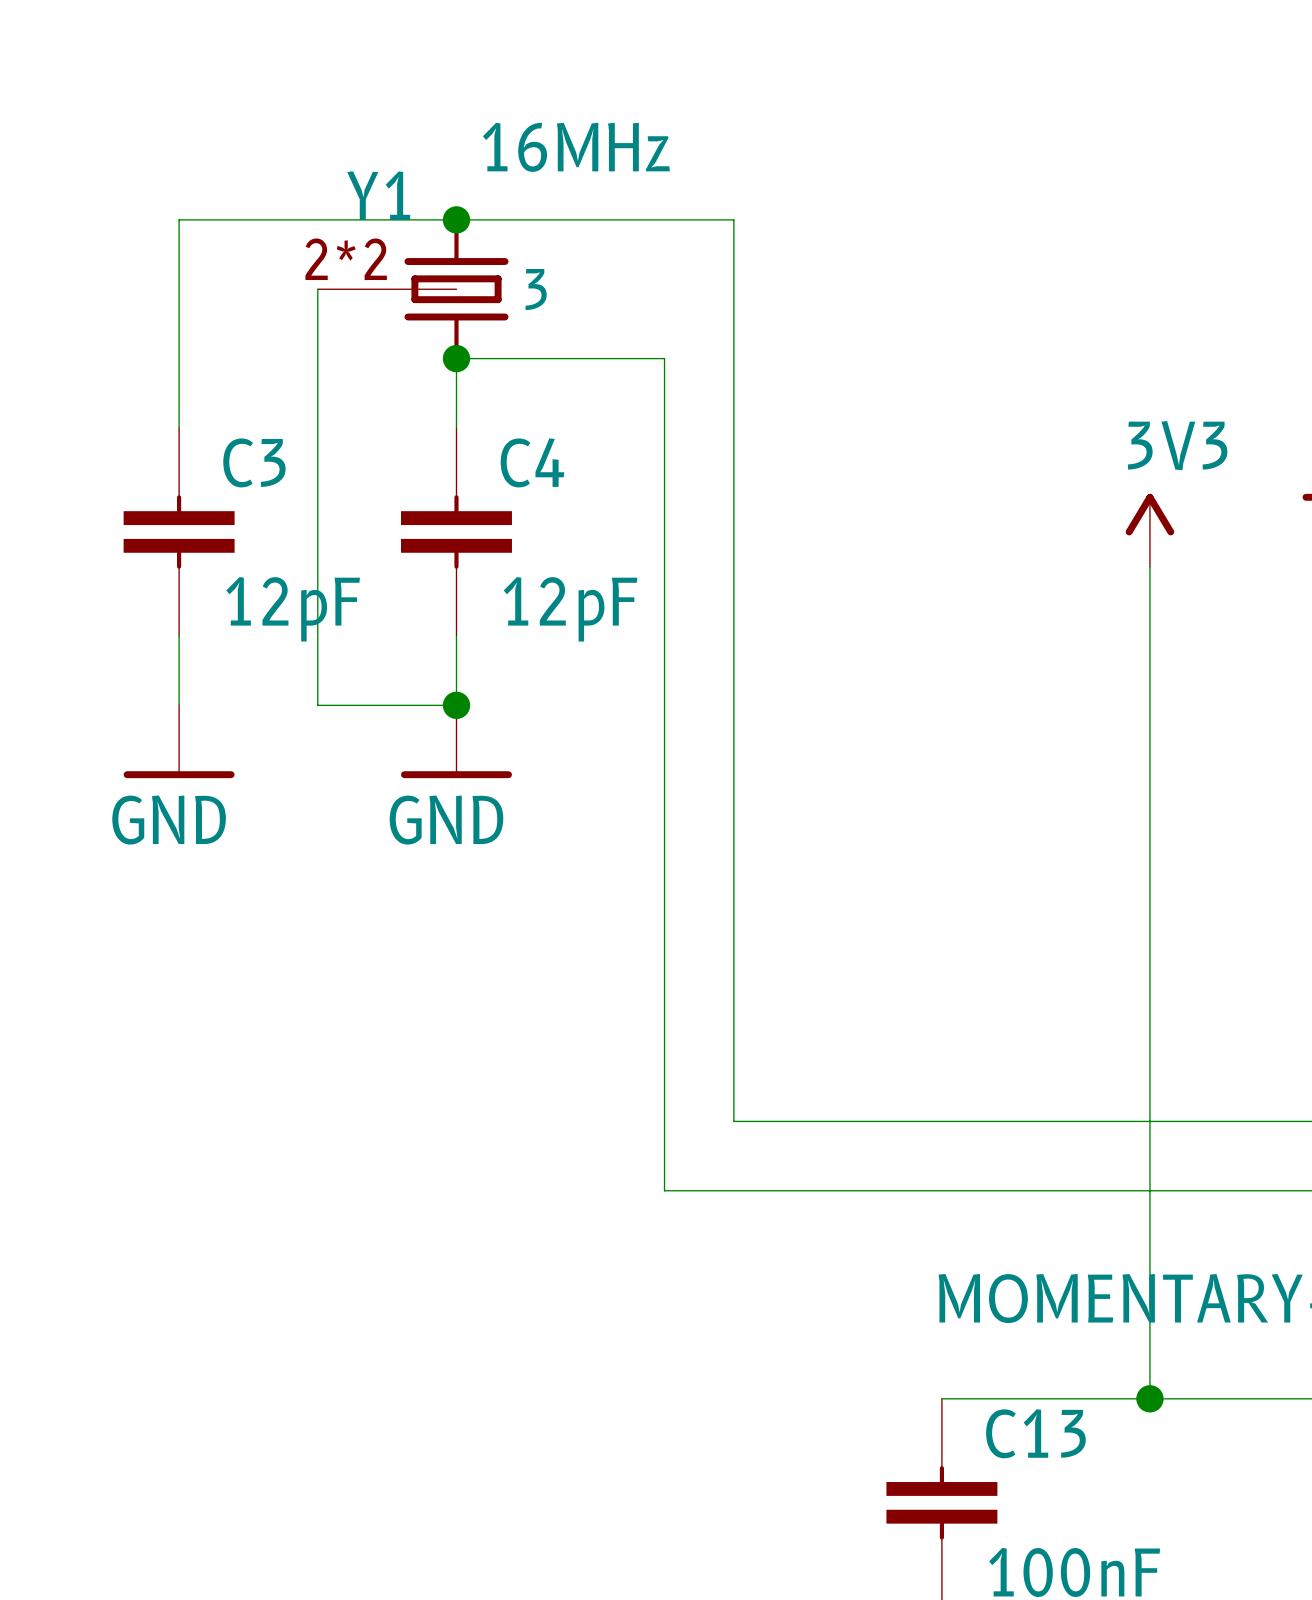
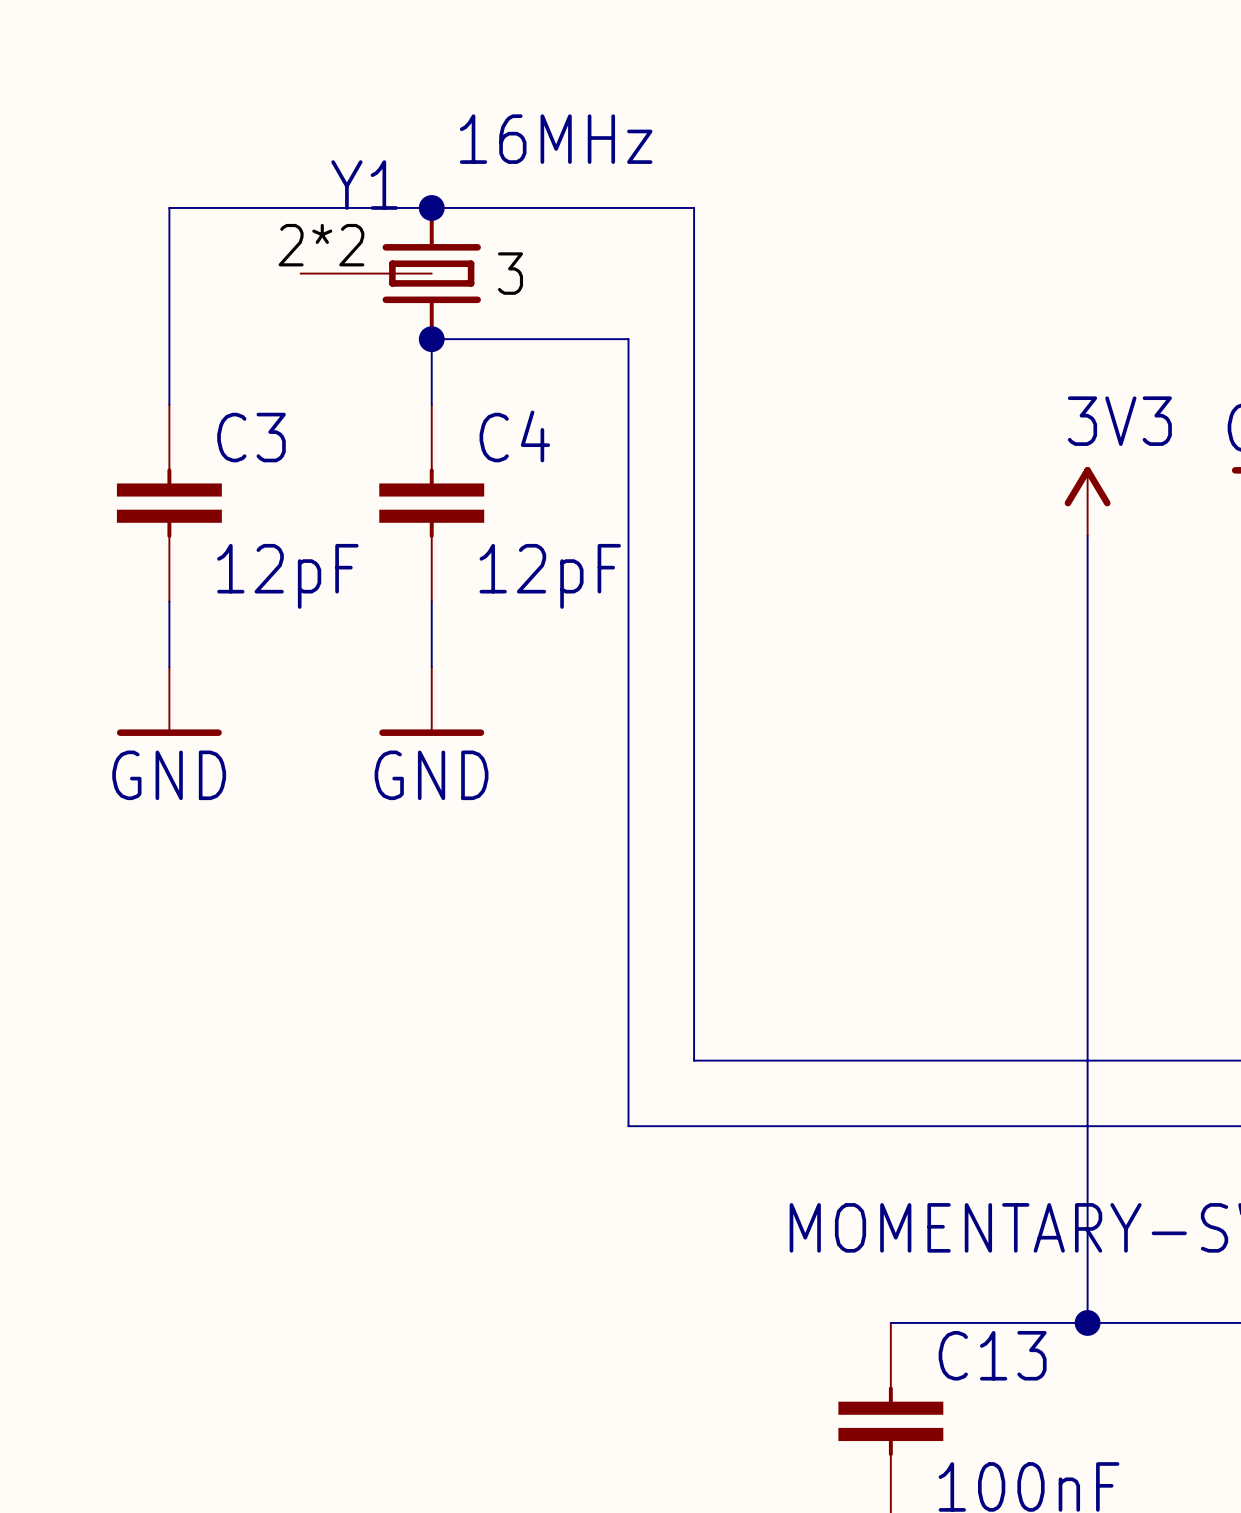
wire: (317, 289) (317, 705) (456, 705) -> none
junction: (456, 705) -> none

